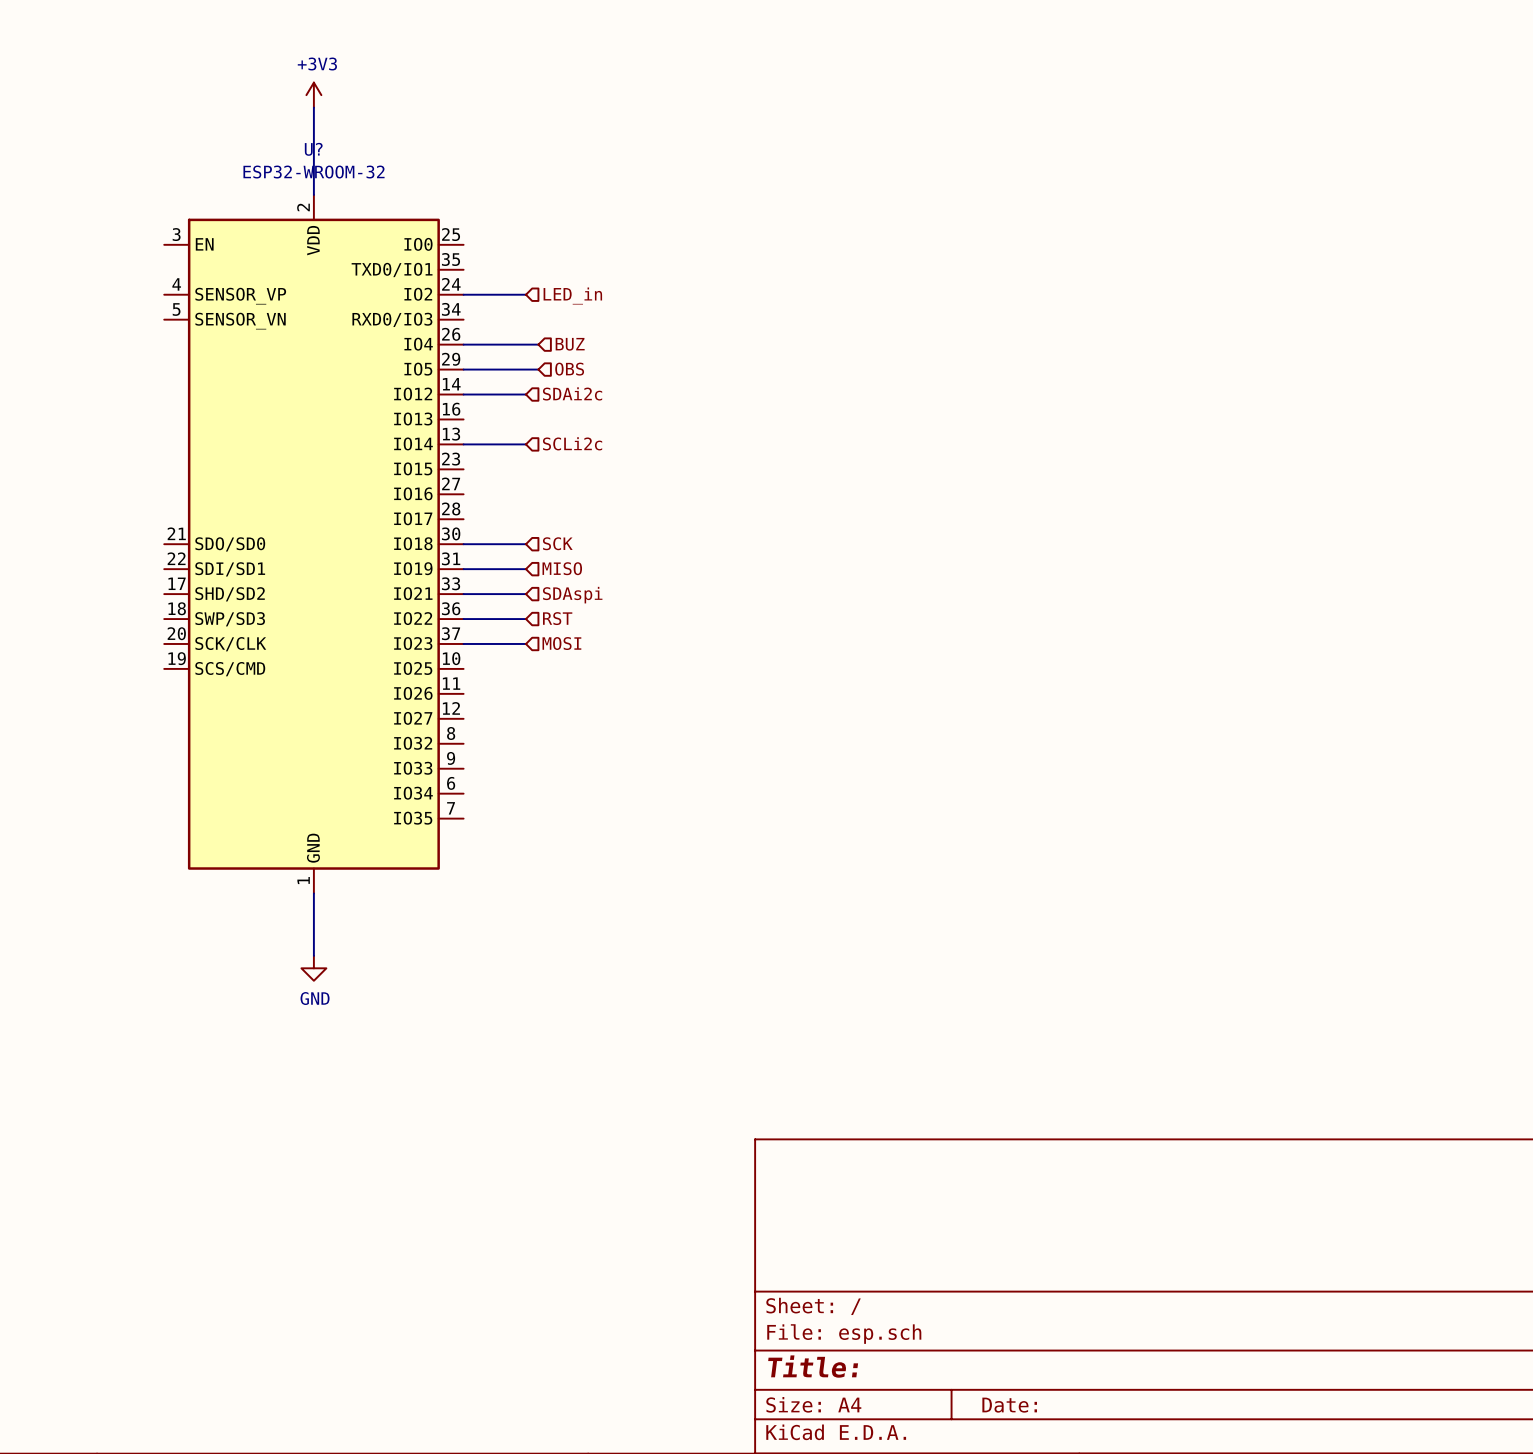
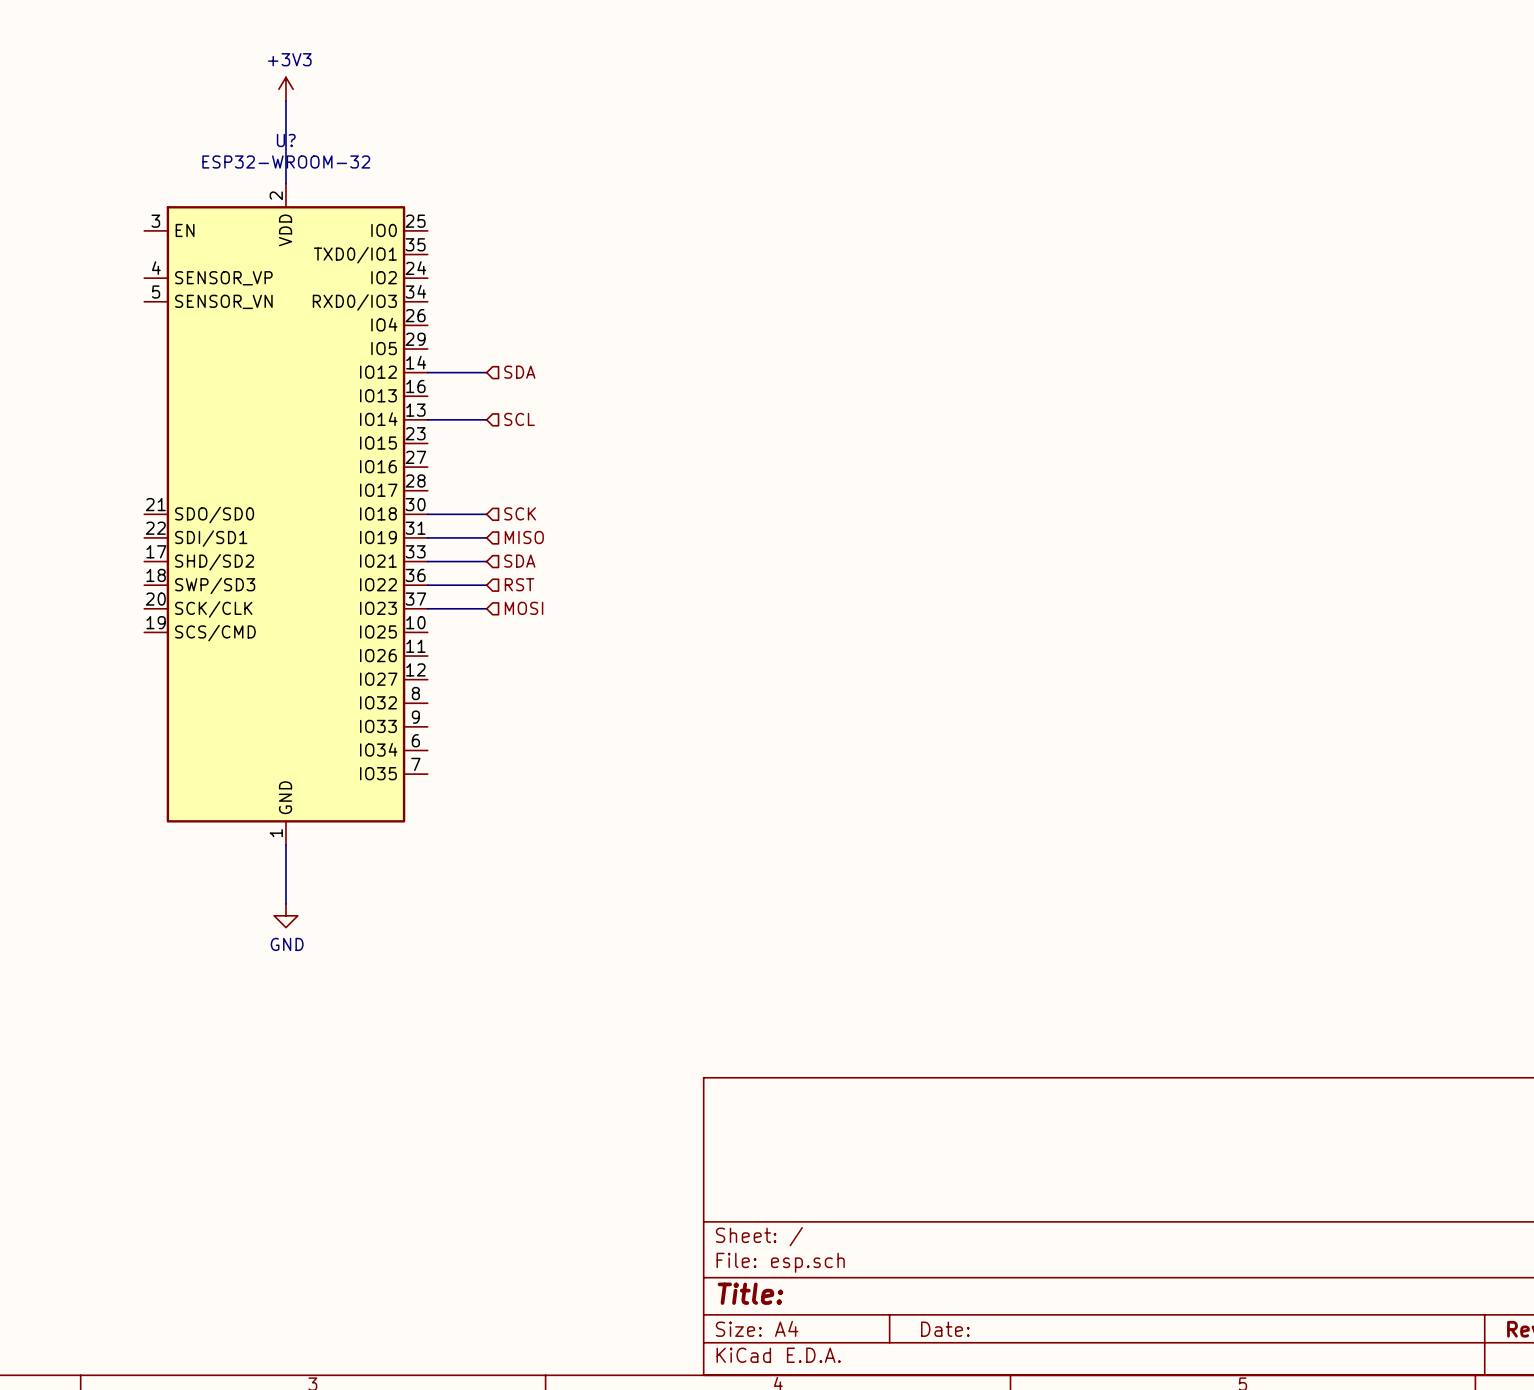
wire: (463, 294) (525, 294) -> none
hierarchical label: LED_in (572, 296) -> none
wire: (463, 344) (538, 344) -> none
hierarchical label: BUZ (570, 344) -> none
wire: (463, 369) (538, 369) -> none
hierarchical label: OBS (569, 369) -> none
hierarchical label: SDAi2c (572, 393) -> SDA (519, 372)
hierarchical label: SCLi2c (572, 443) -> SCL (519, 419)
hierarchical label: SDAspi (572, 595) -> SDA (519, 561)

